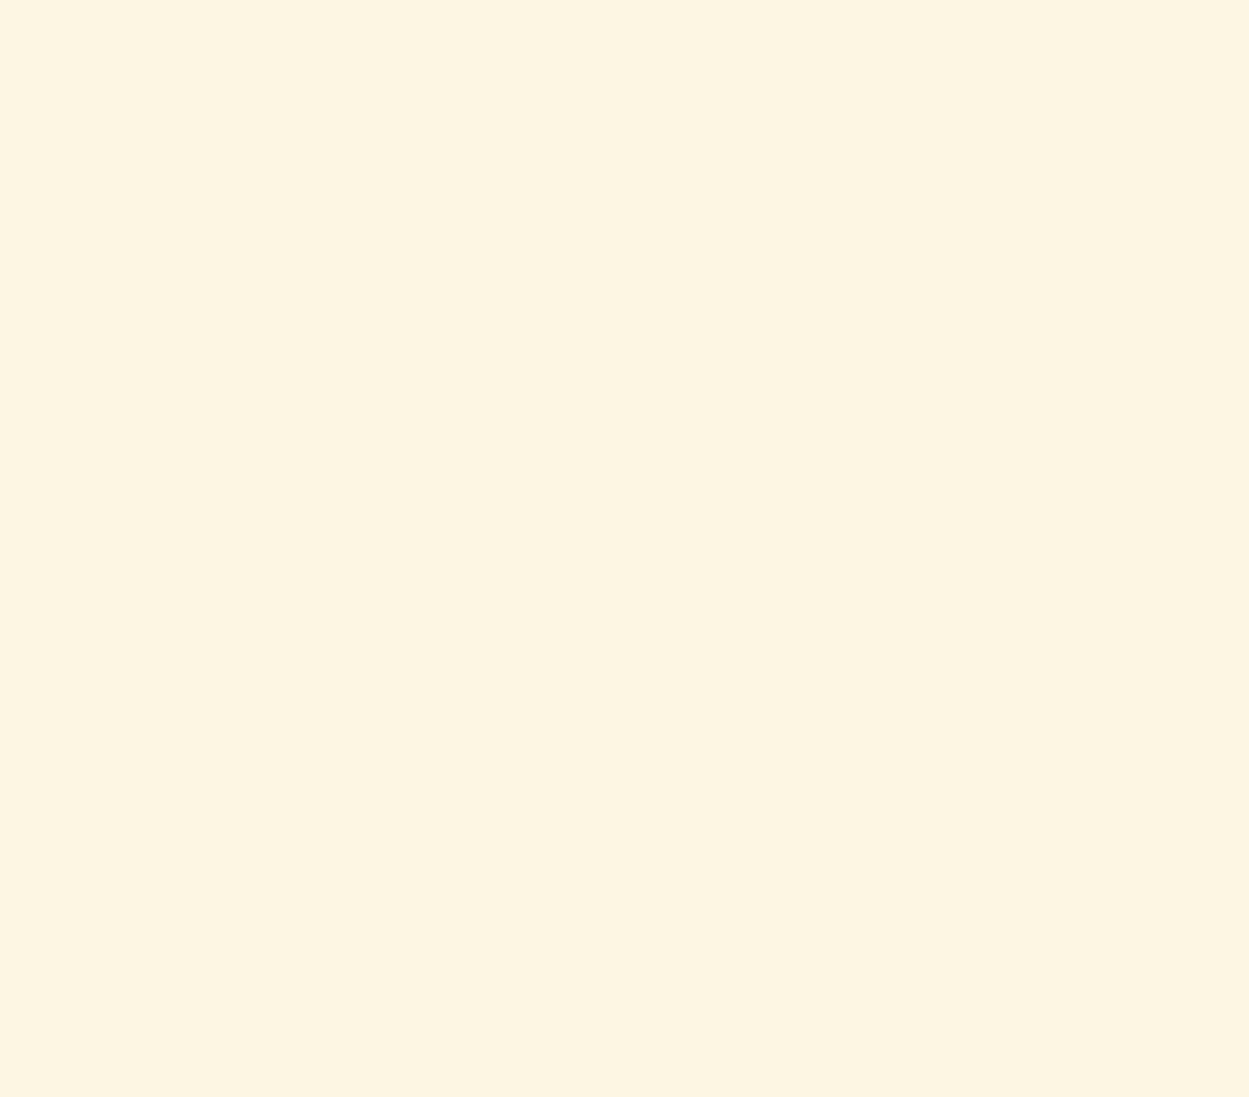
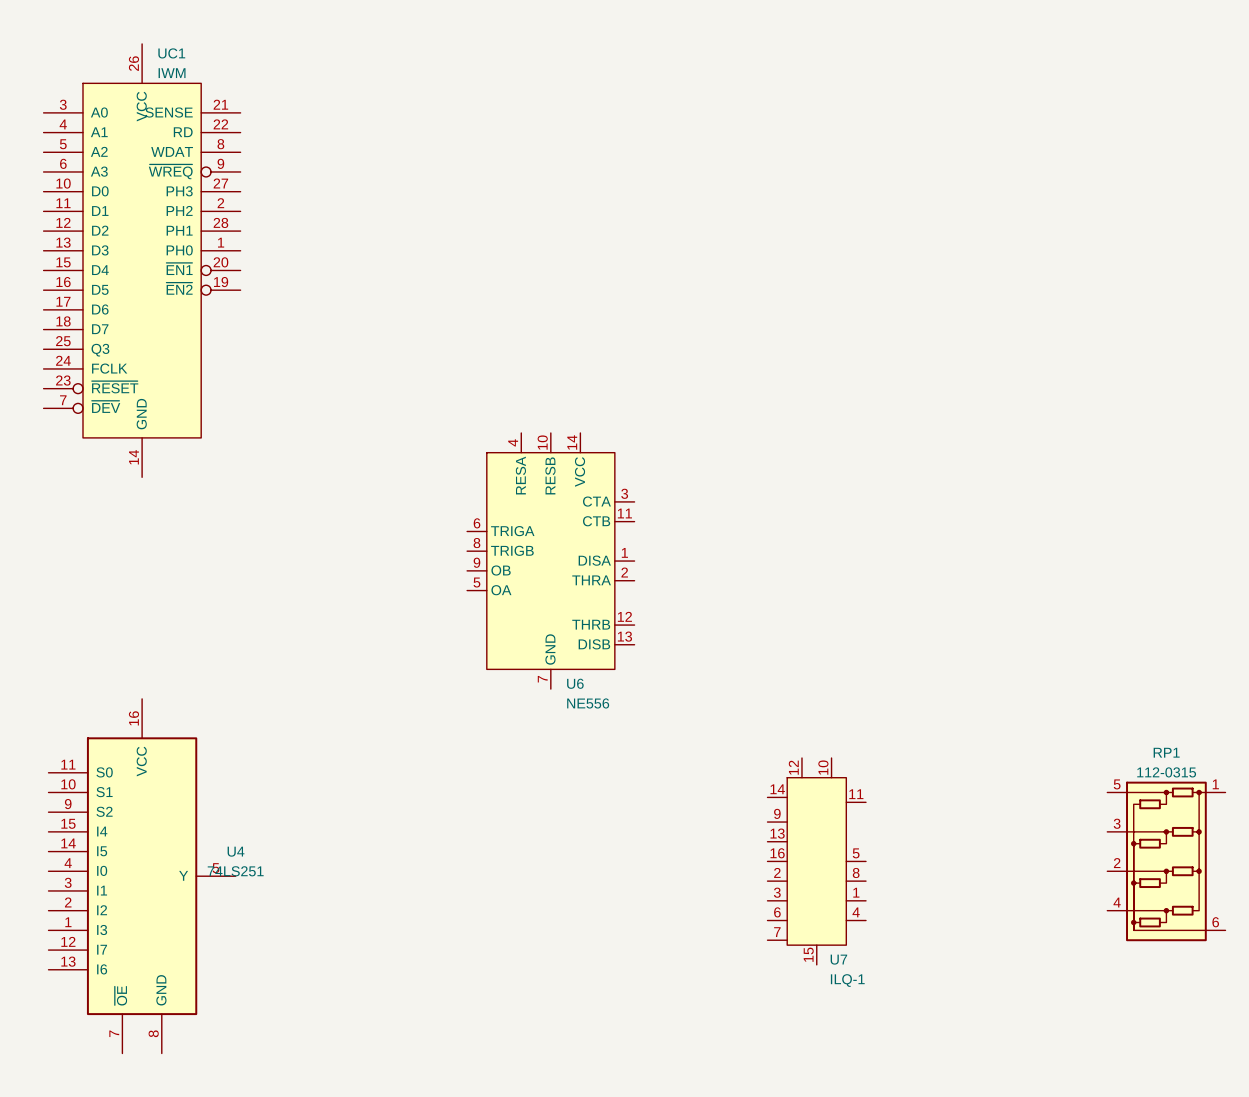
UC1: none -> IWM (142, 260)
U6: none -> NE556 (550, 561)
U7: none -> ILQ-1 (816, 861)
RP1: none -> 112-0315 (1166, 861)
U4: none -> 74LS251 (142, 876)

